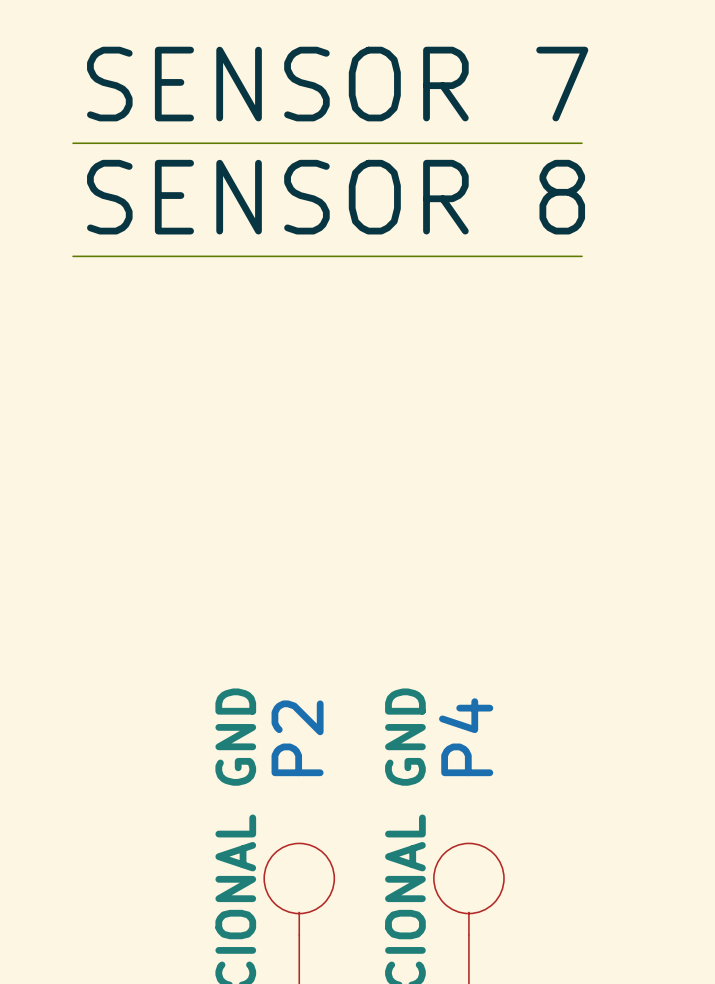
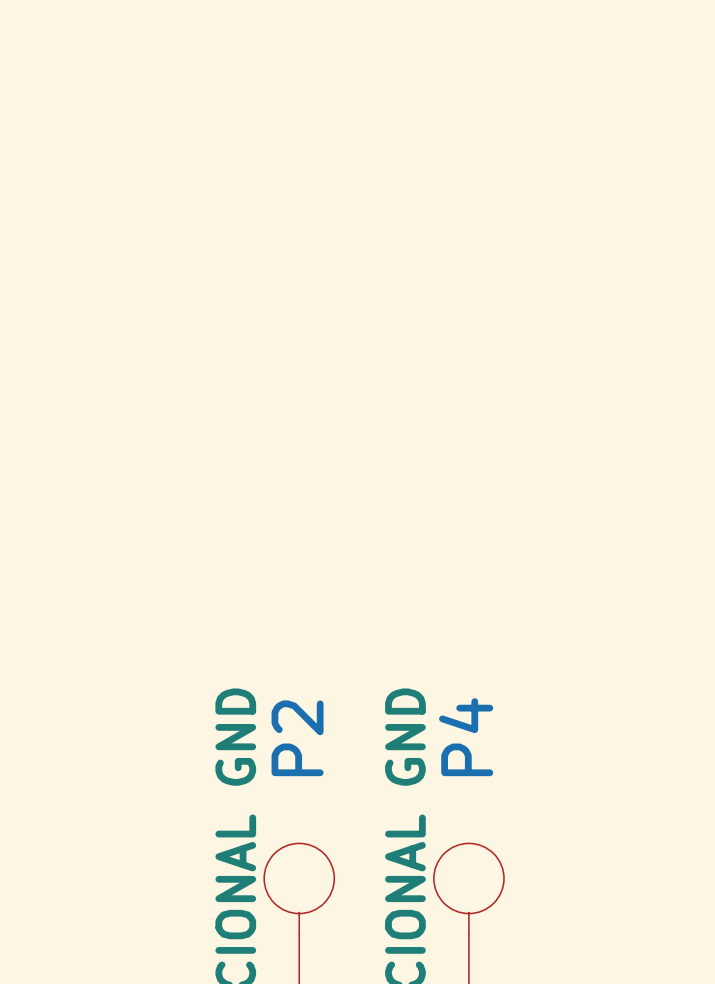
label: SENSOR 7 (337, 84) -> none
wire: (73, 143) (582, 143) -> none
label: SENSOR 8 (336, 197) -> none
wire: (73, 256) (582, 256) -> none

